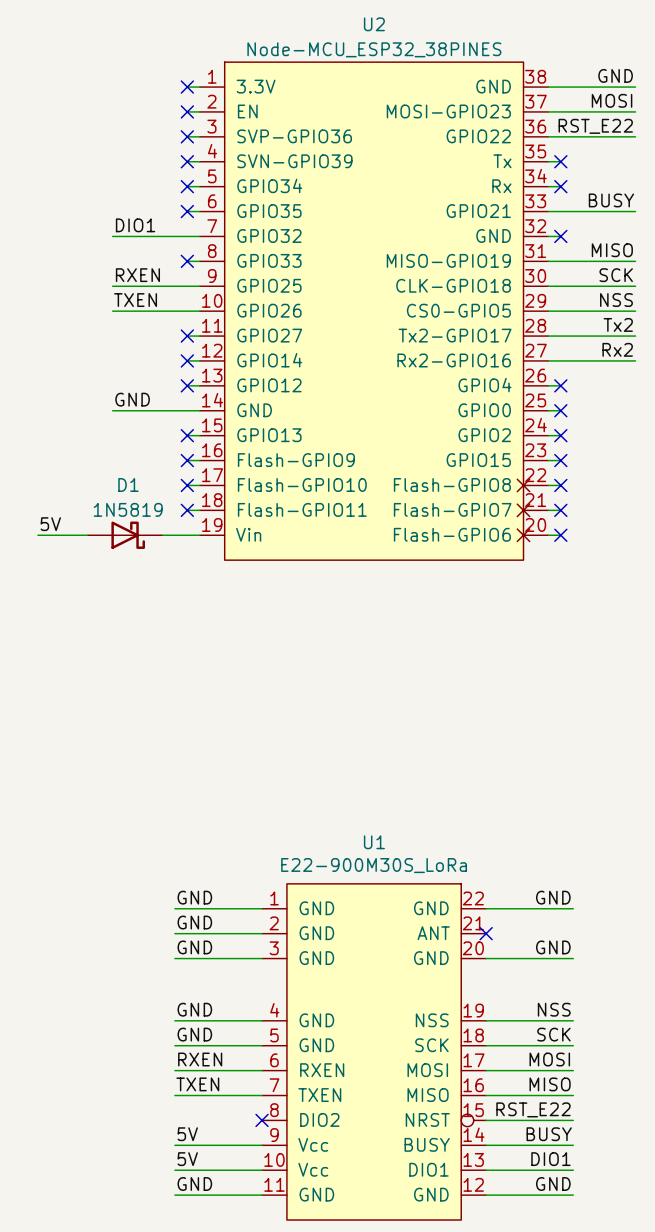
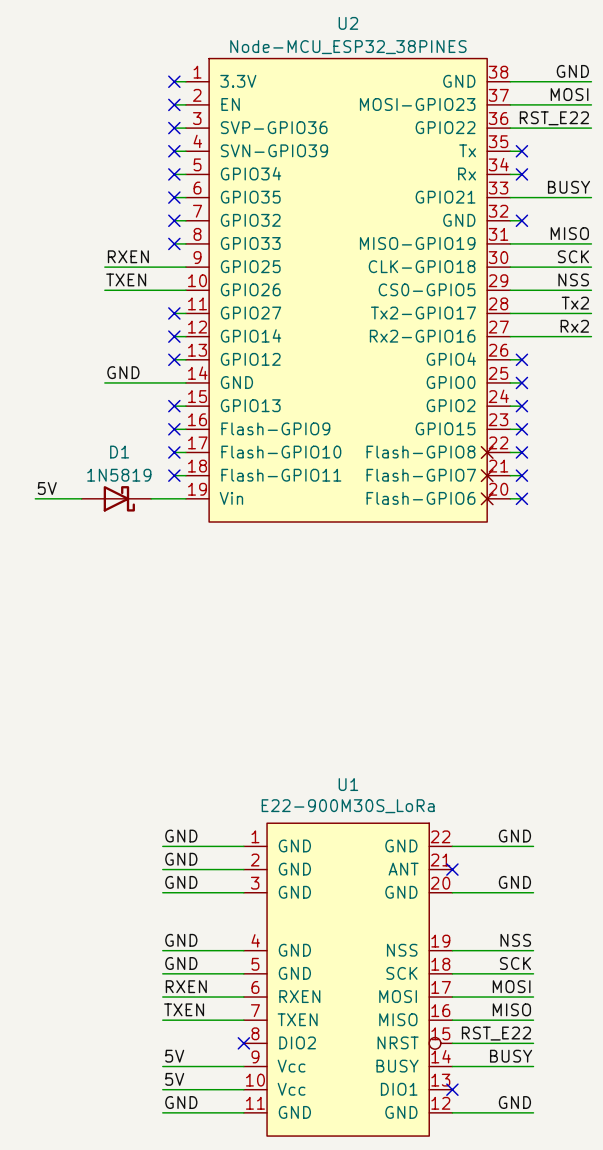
label: DIO1 (135, 225) -> none
wire: (112, 236) (187, 236) -> none
no-connect mark: none -> (174, 220)
label: DIO1 (550, 1159) -> none
wire: (486, 1170) (573, 1170) -> none
no-connect mark: none -> (452, 1089)

